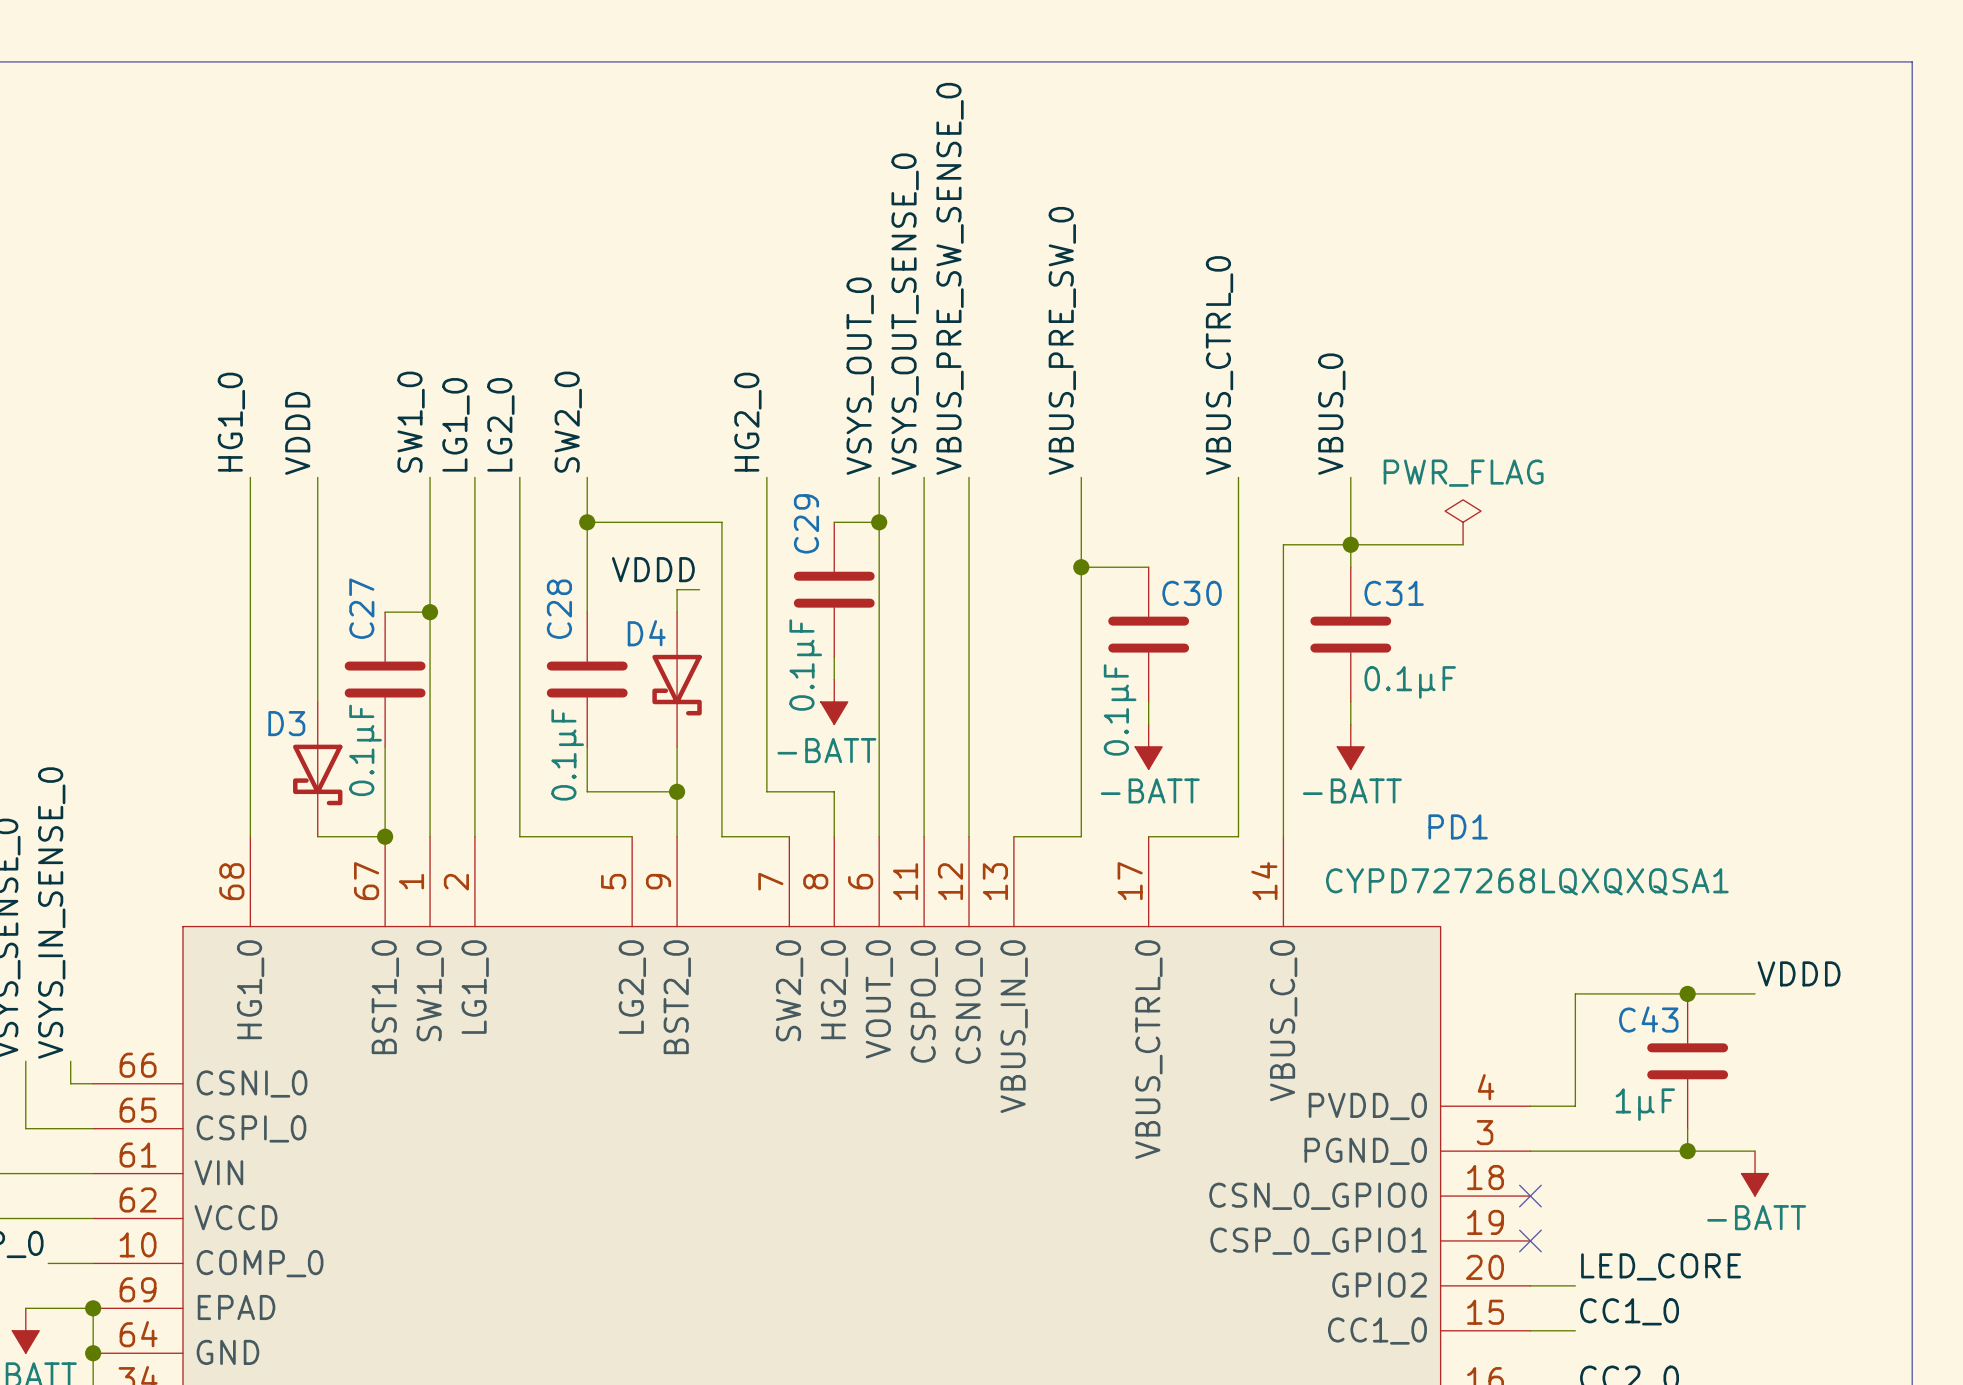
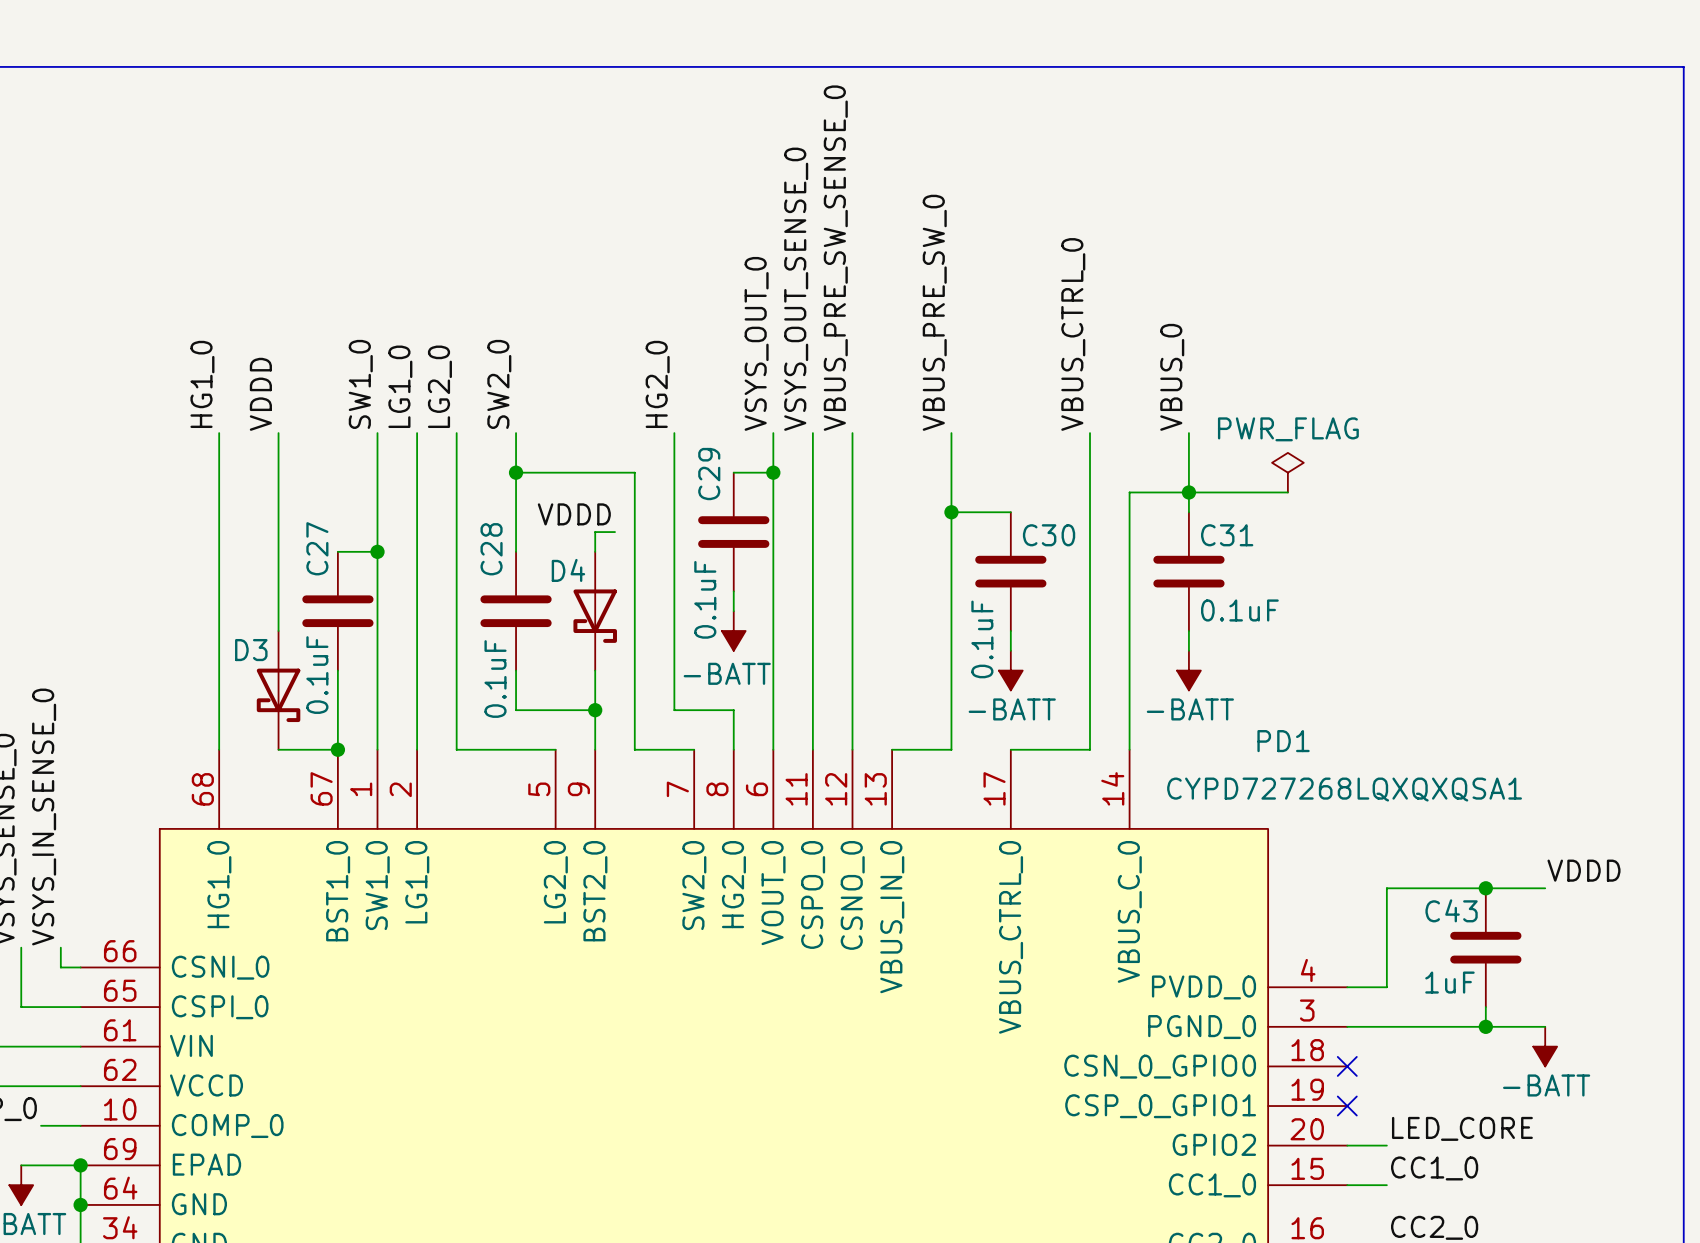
C29 value: 0.1μF (805, 665) -> 0.1uF (705, 599)
C31 value: 0.1μF (1410, 682) -> 0.1uF (1239, 610)
C30 value: 0.1μF (1120, 709) -> 0.1uF (982, 639)
C27 value: 0.1μF (365, 750) -> 0.1uF (317, 675)
C28 value: 0.1μF (567, 754) -> 0.1uF (495, 679)
C43 value: 1μF (1645, 1104) -> 1uF (1449, 982)

